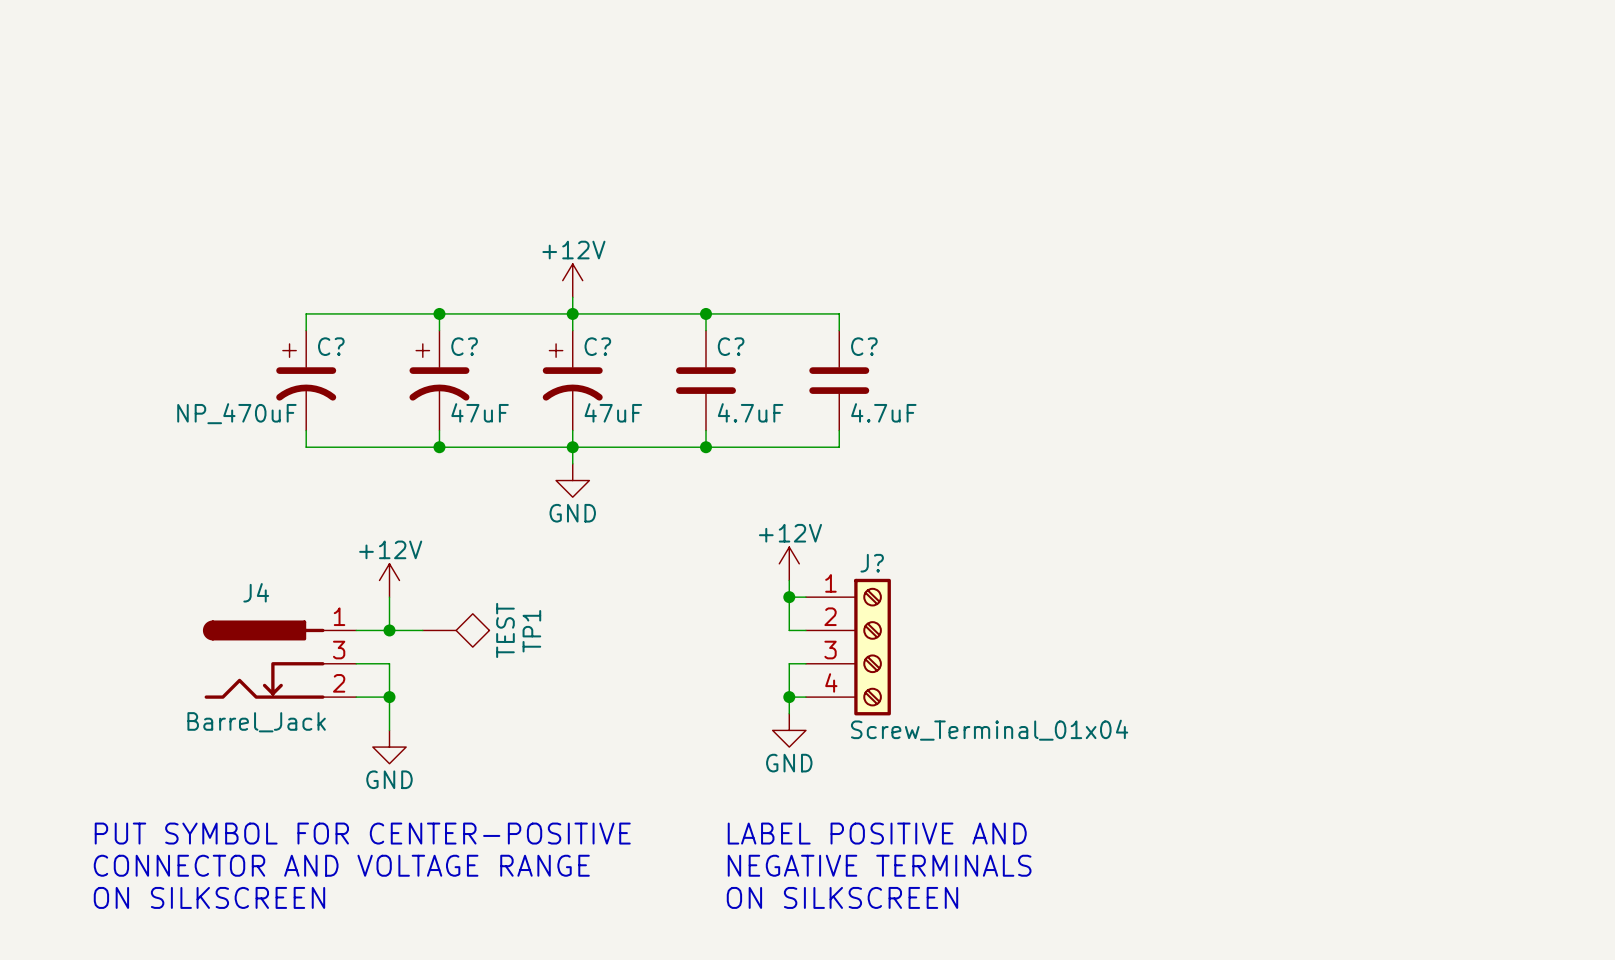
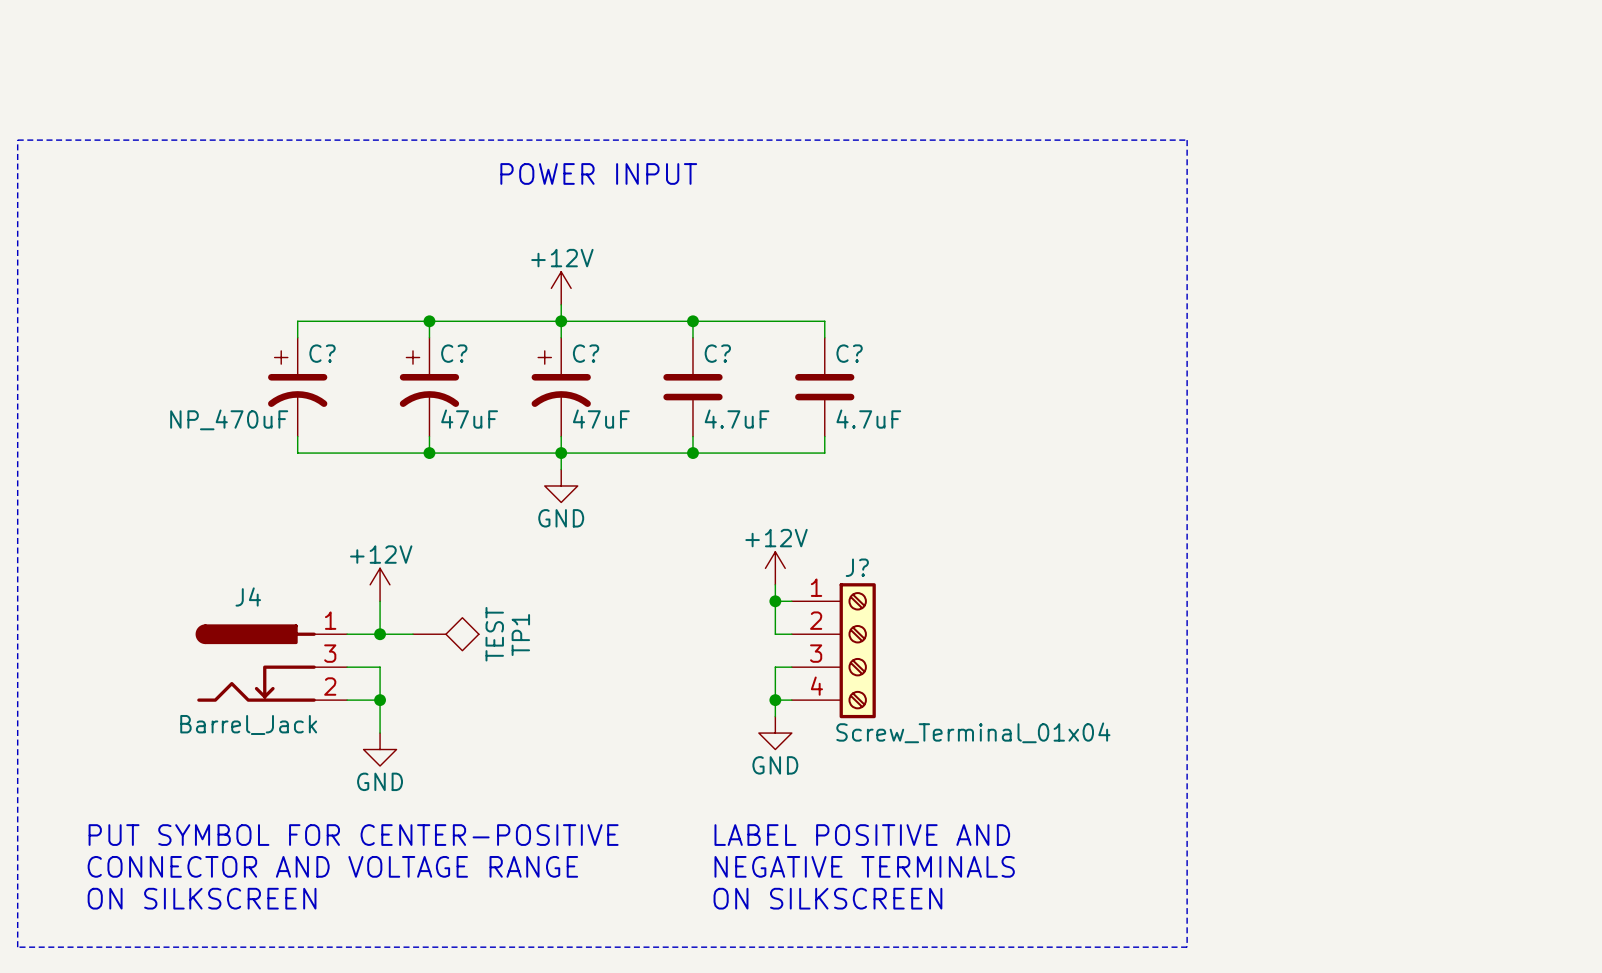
line: none -> (17, 140) (1187, 140) (1187, 947) (17, 947) (17, 140)
text: none -> POWER INPUT (598, 173)

